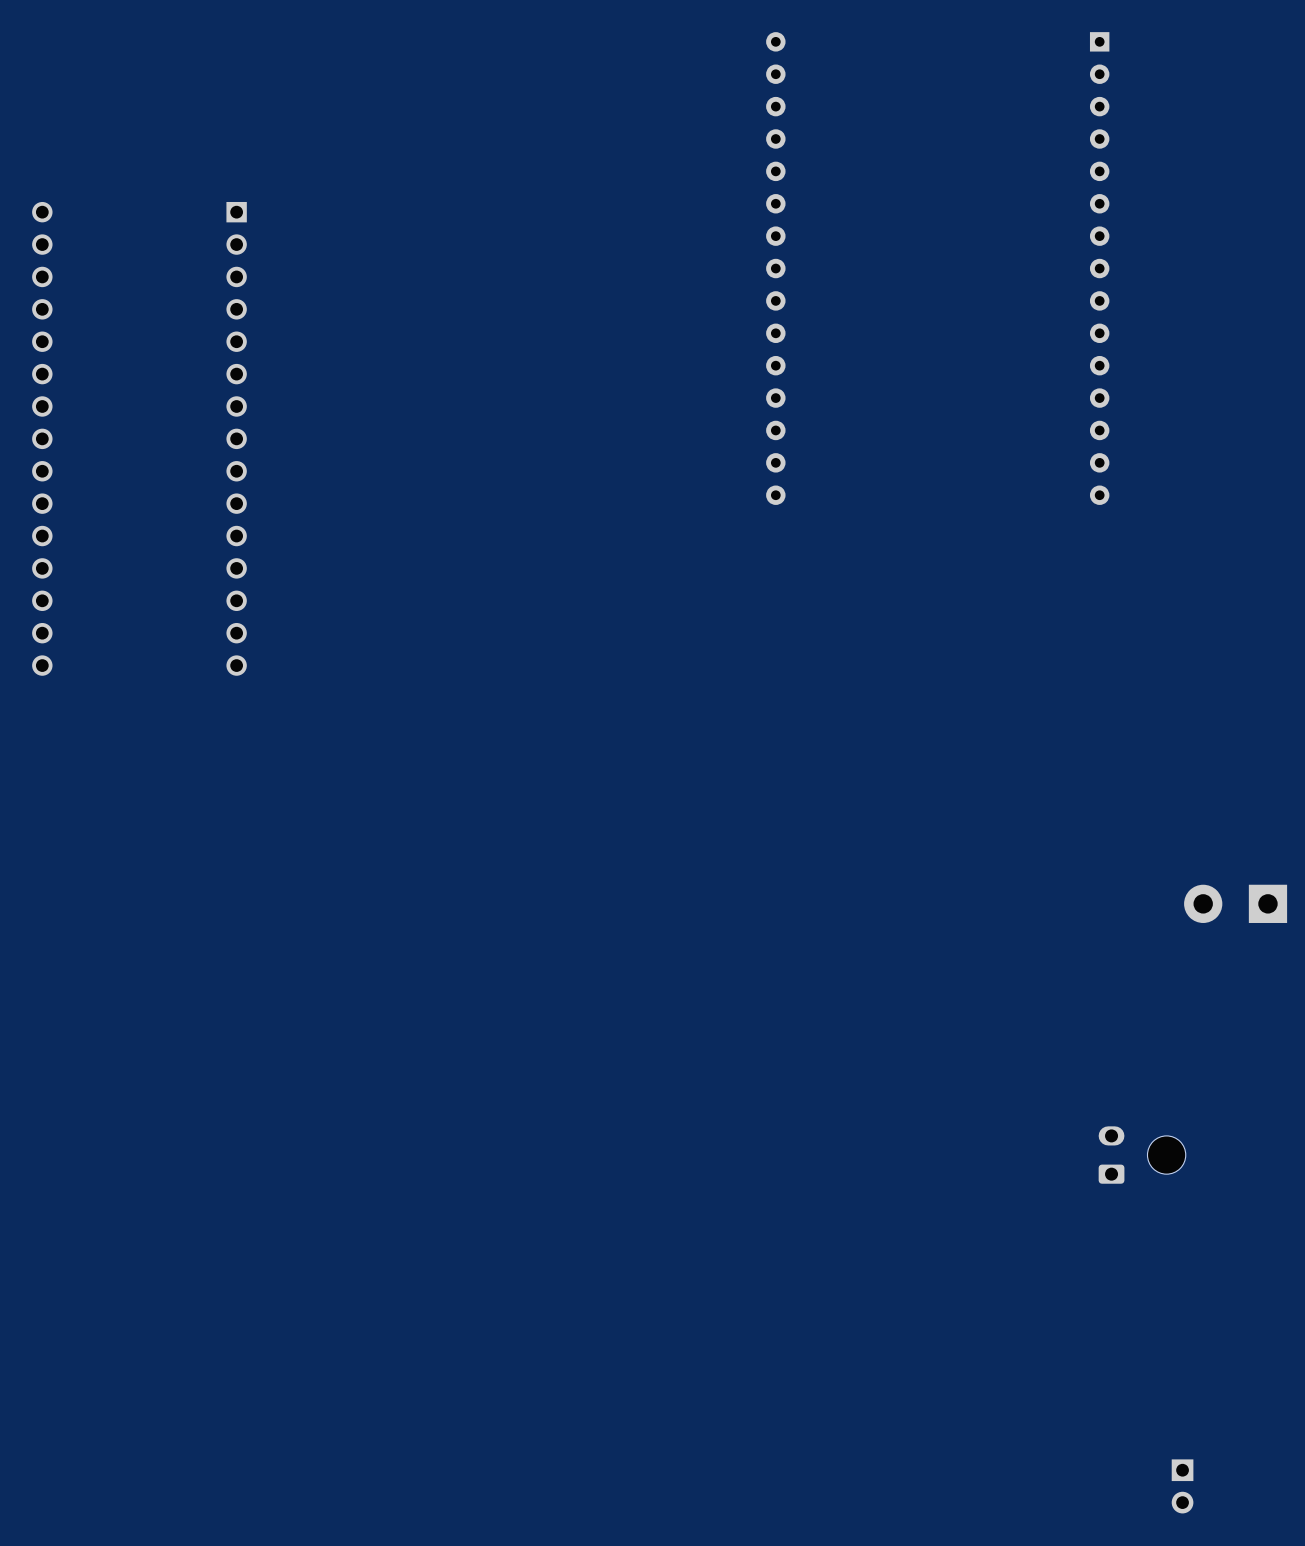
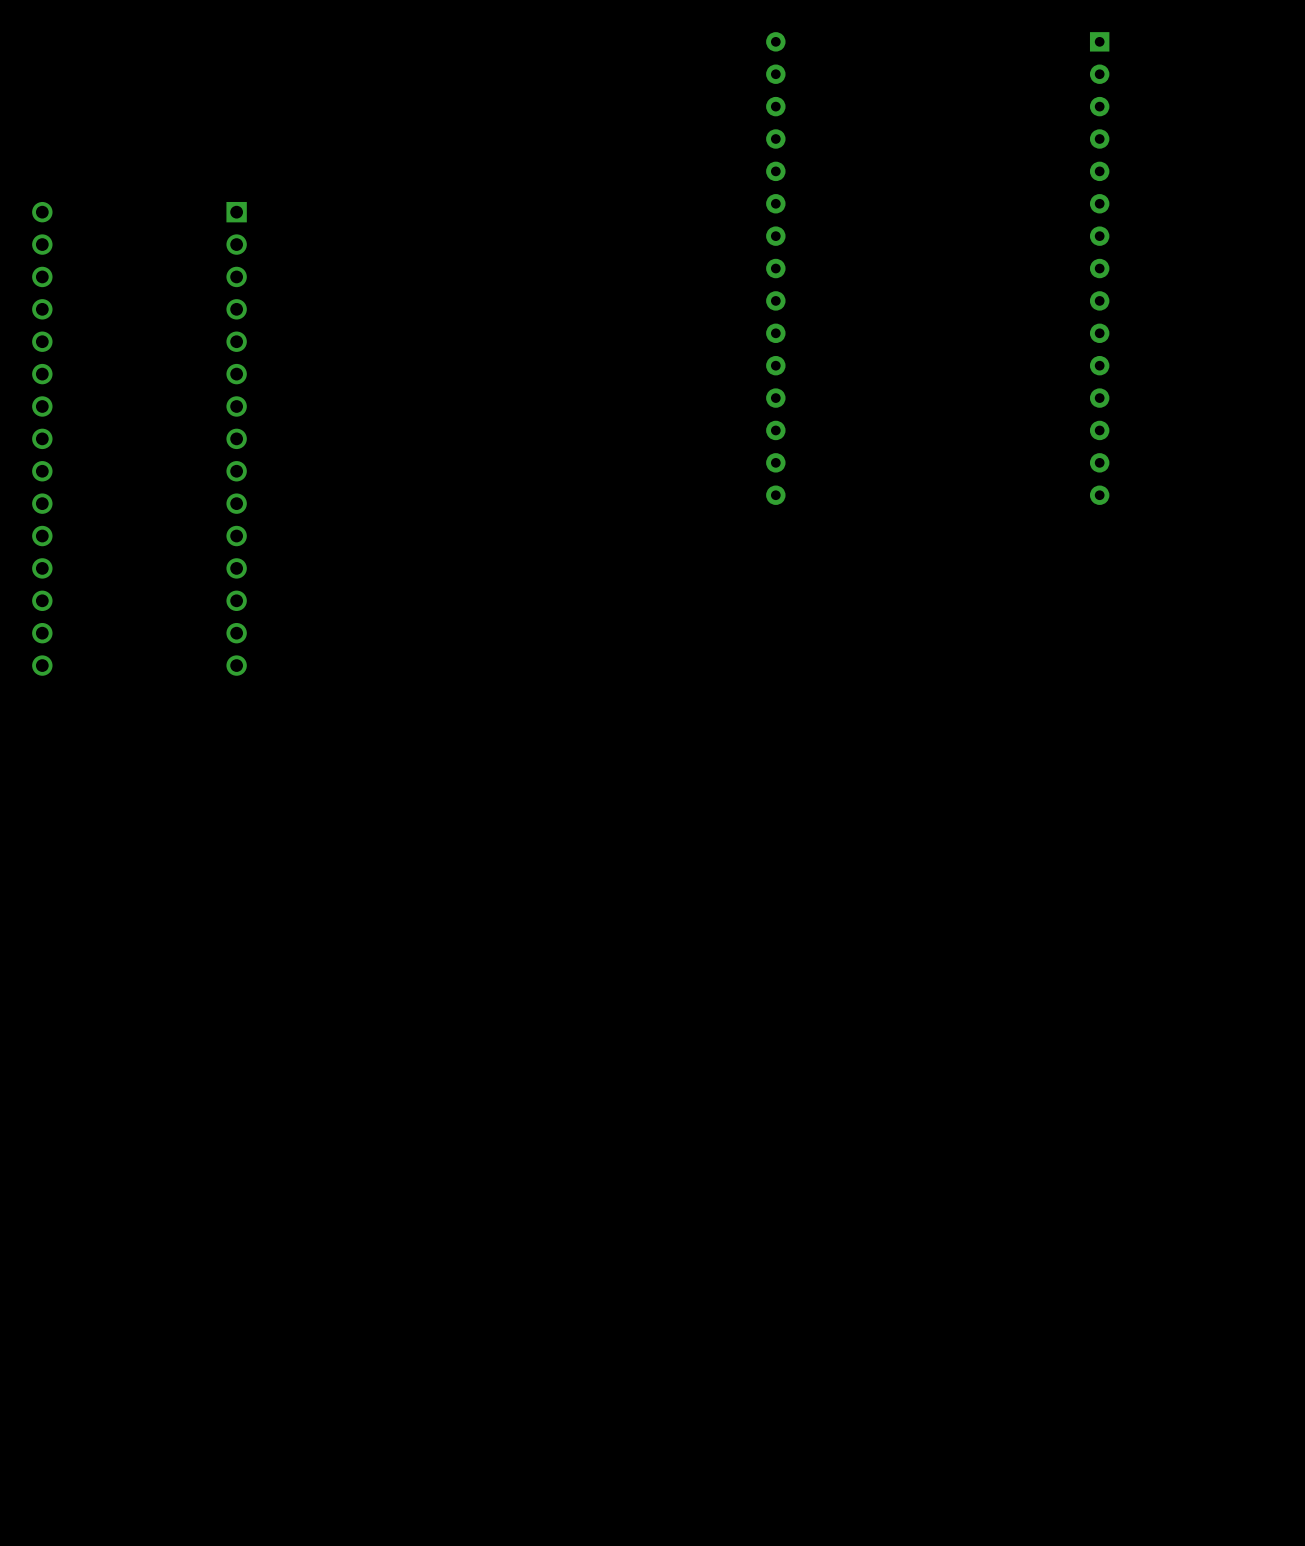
part: (1235, 903) -> none
part: (1142, 1155) -> none
part: (1182, 1486) -> none

